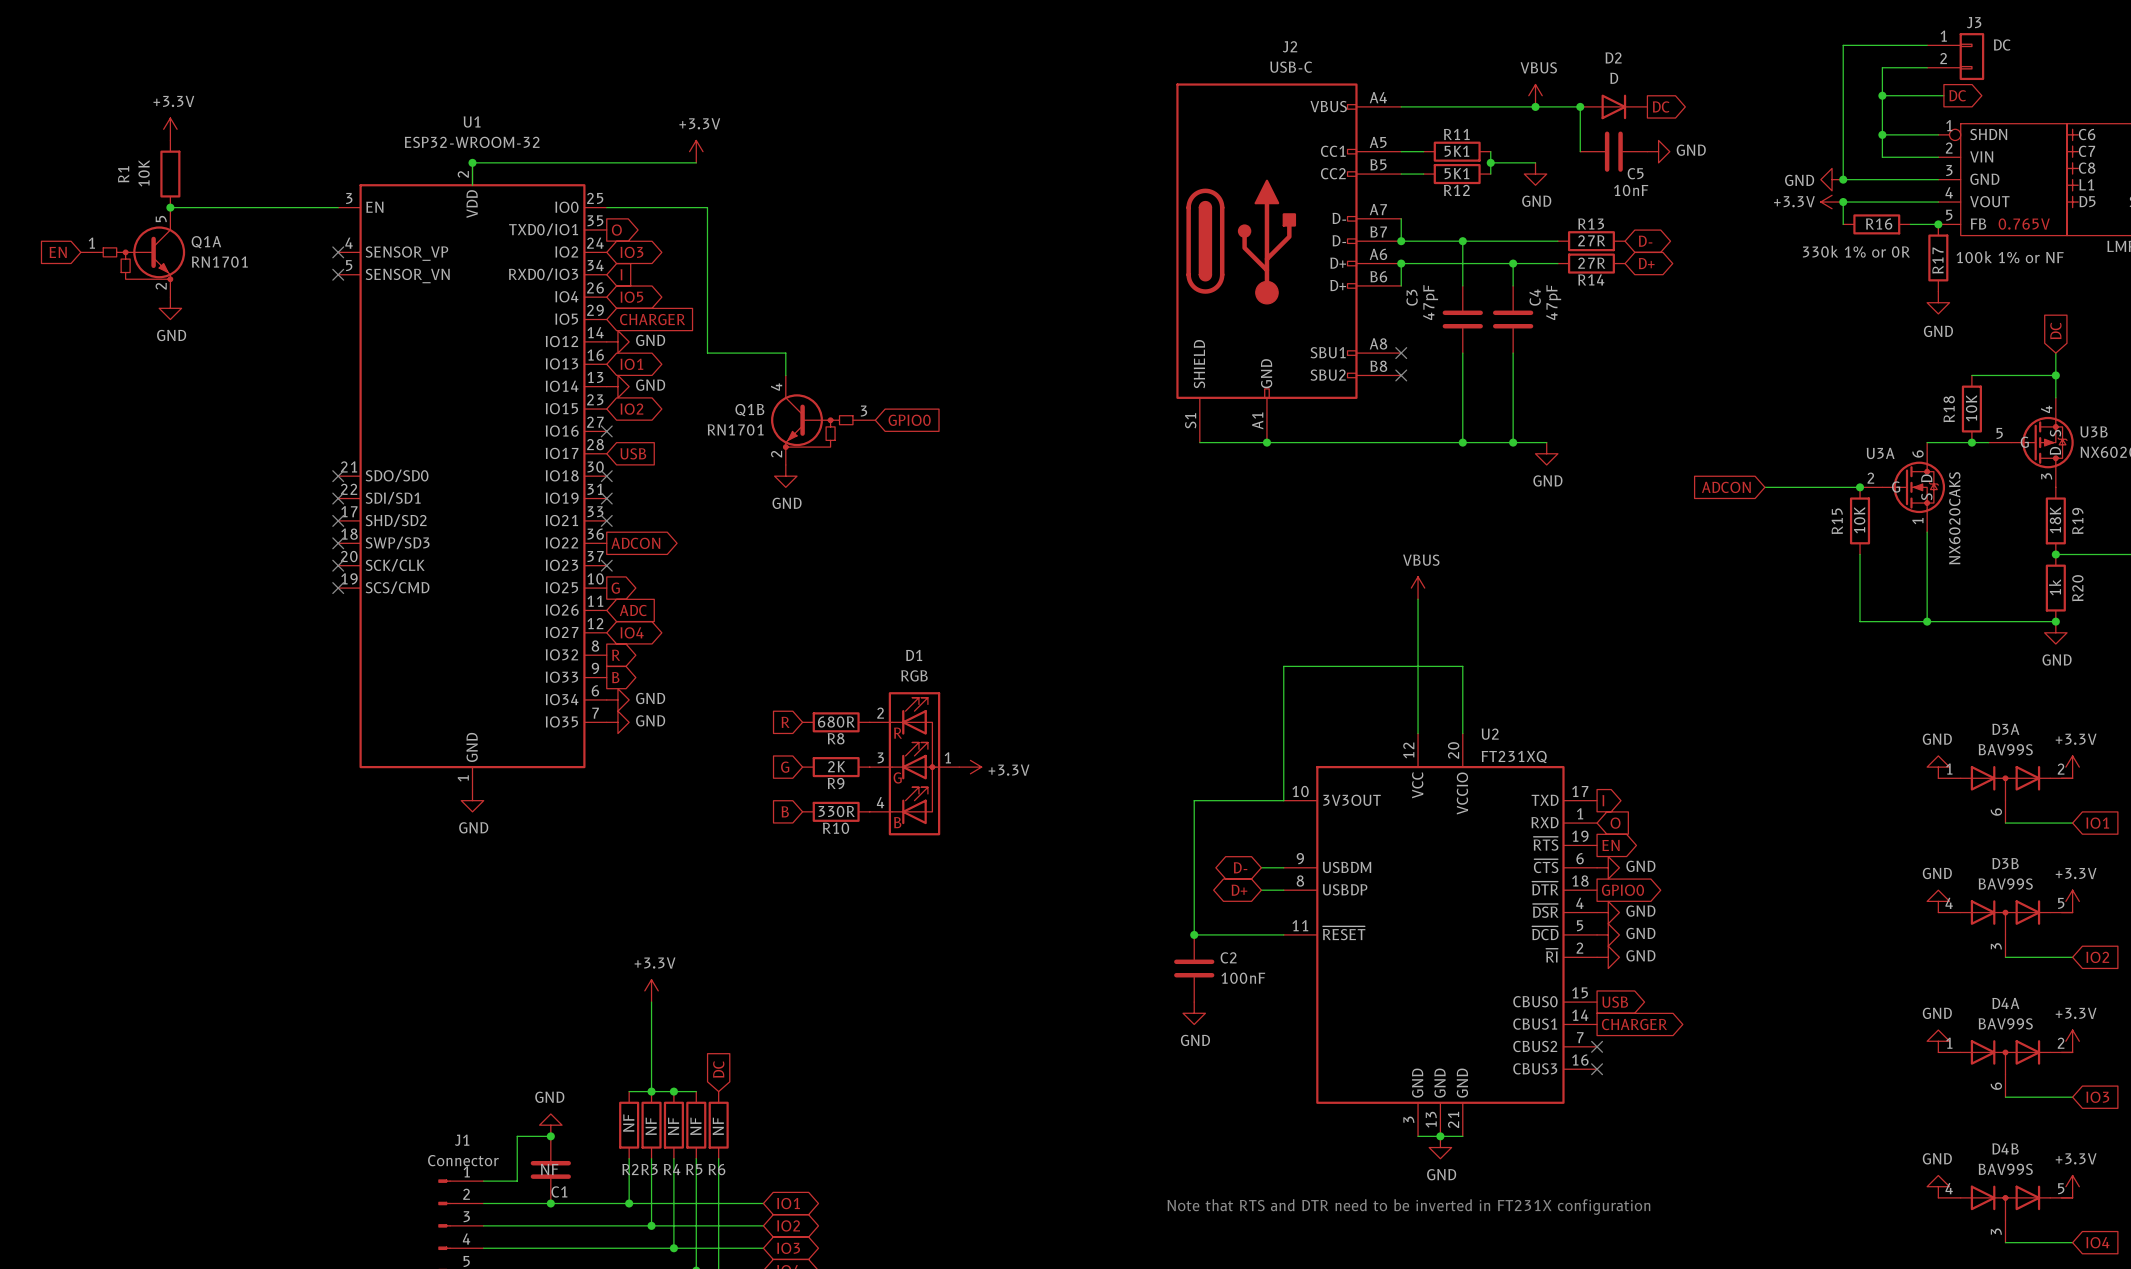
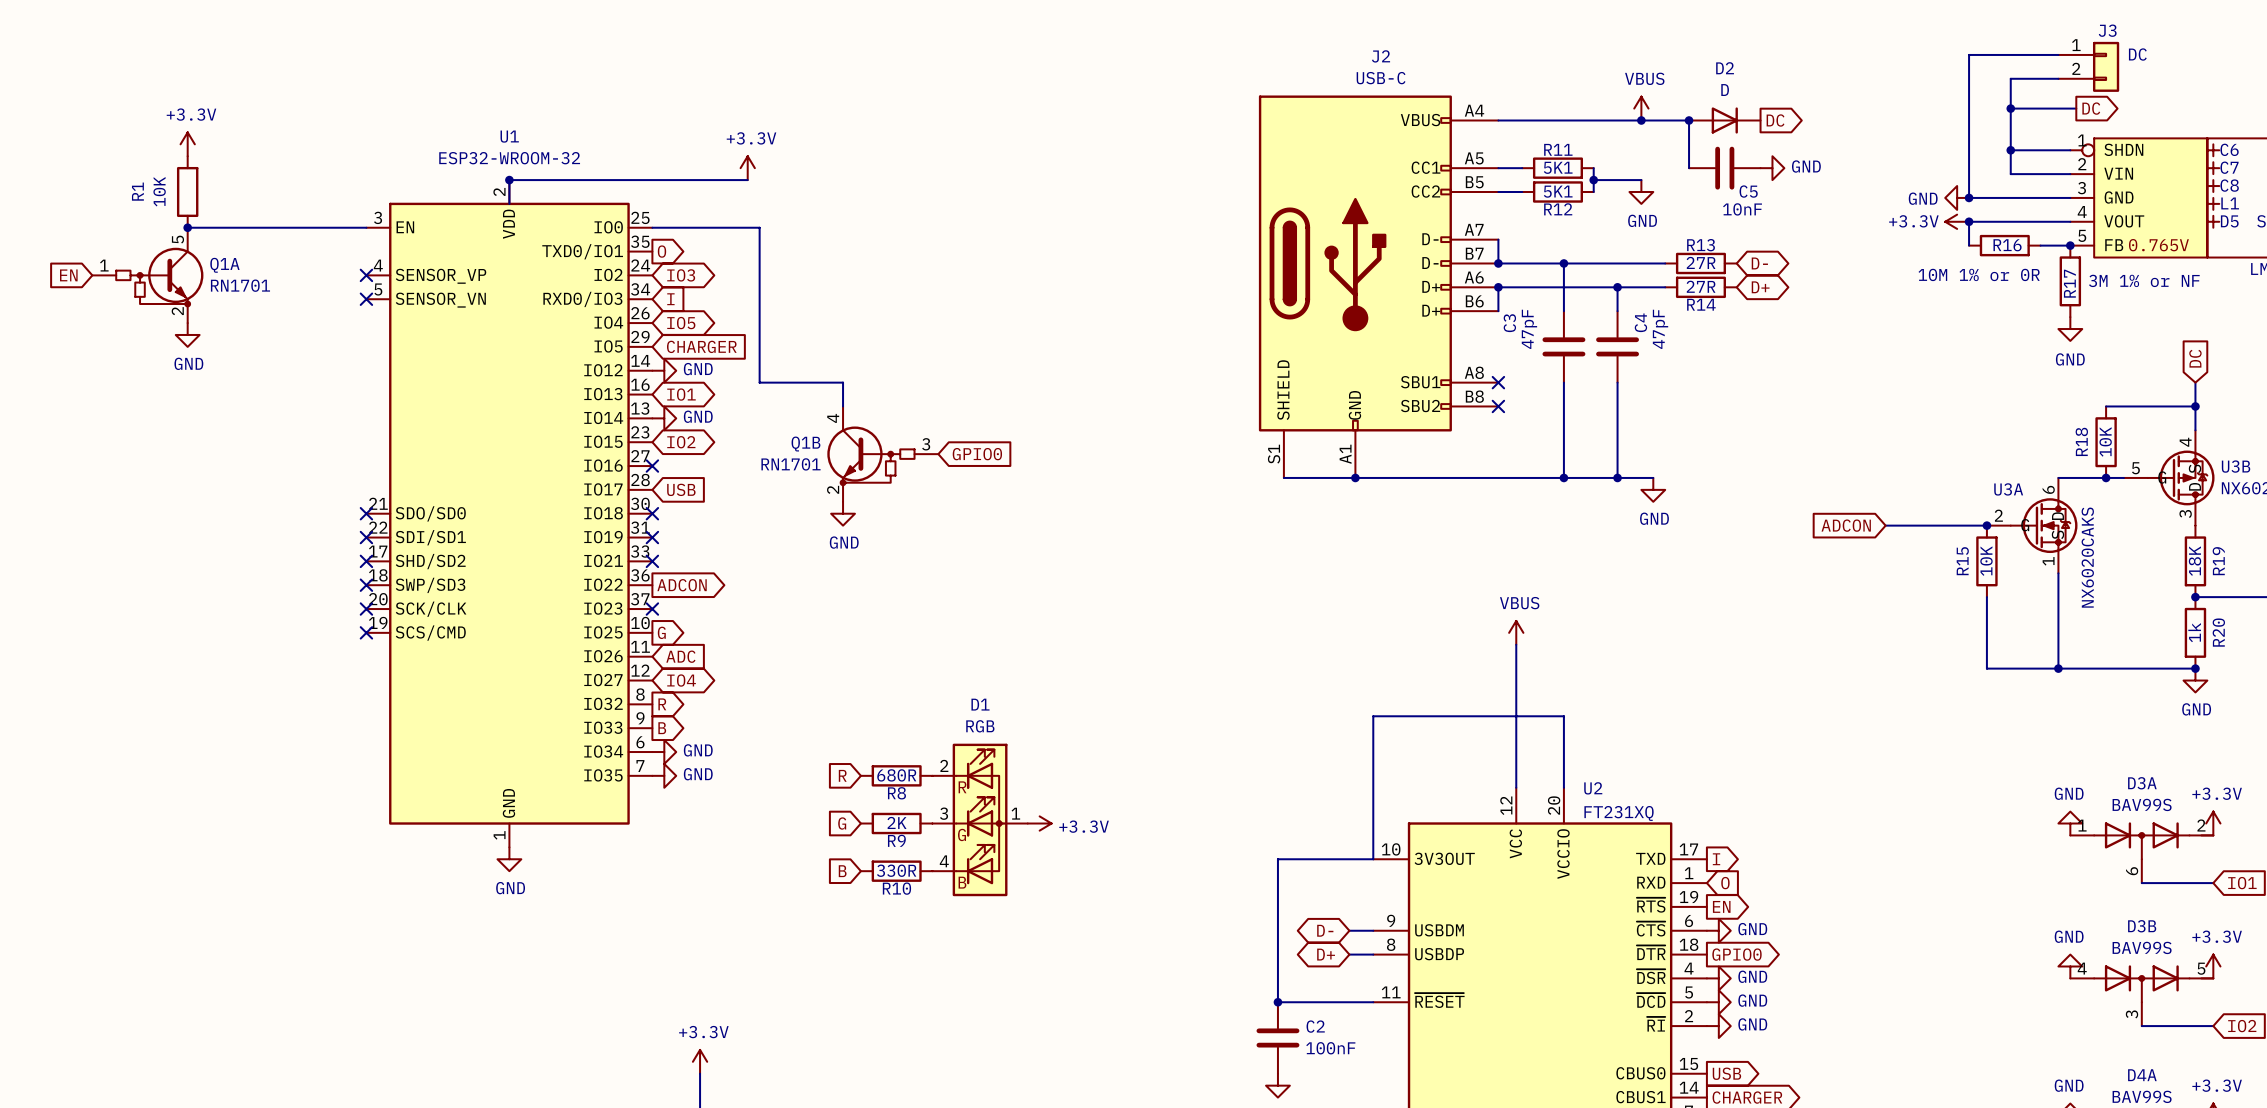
R16 value: 330k 1% or 0R (1856, 251) -> 10M 1% or 0R (1979, 274)
R17 value: 100k 1% or NF (2010, 257) -> 3M 1% or NF (2144, 280)

